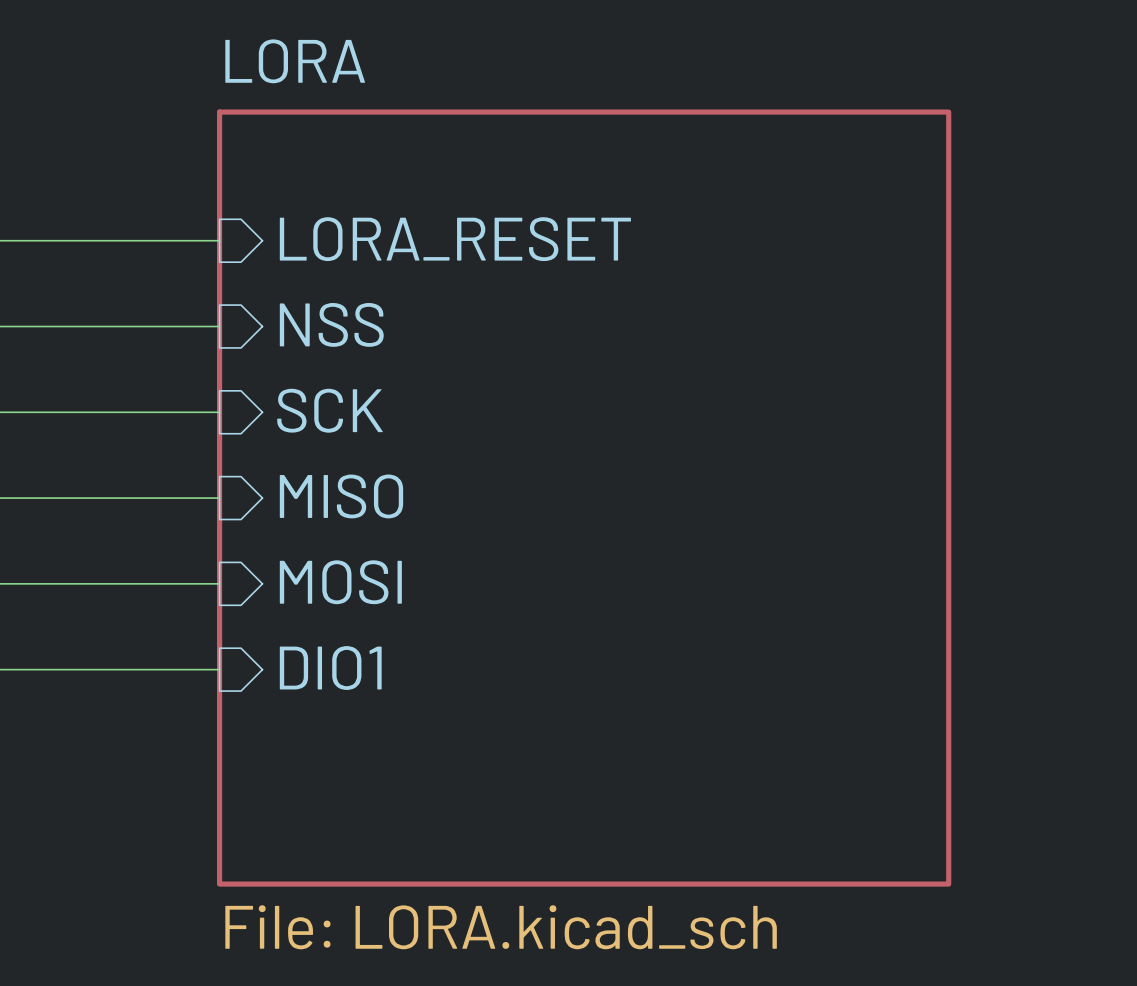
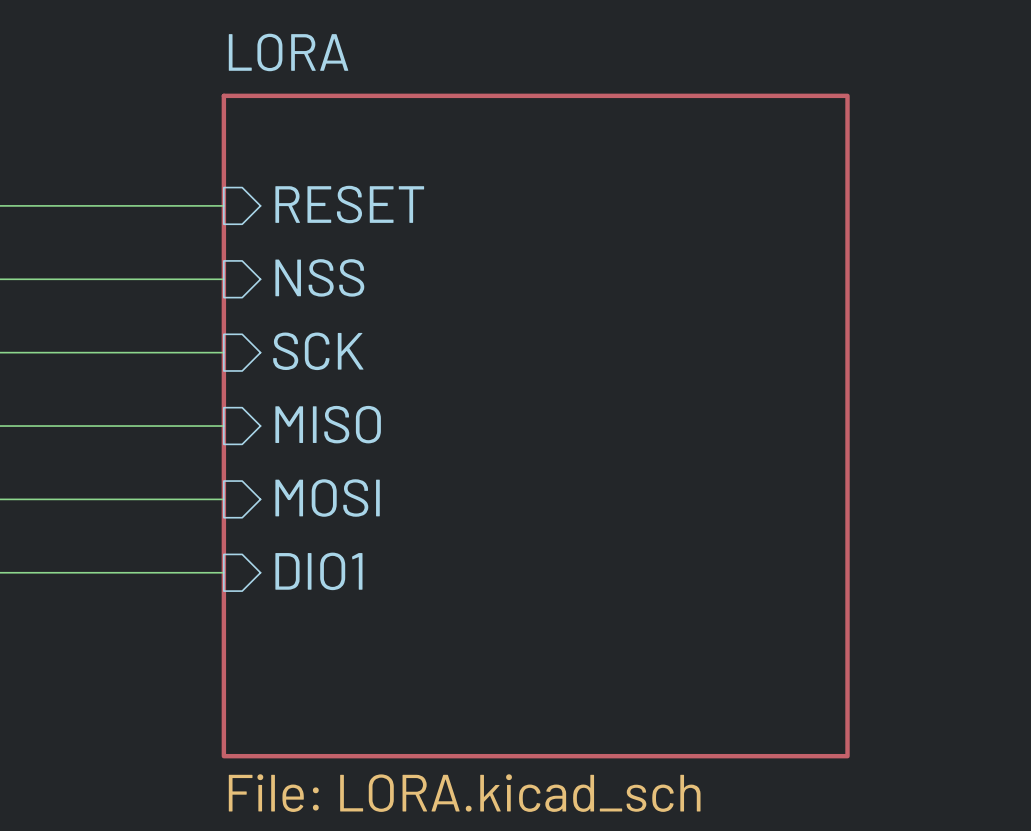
sheet pin: LORA_RESET (455, 239) -> RESET (349, 204)

